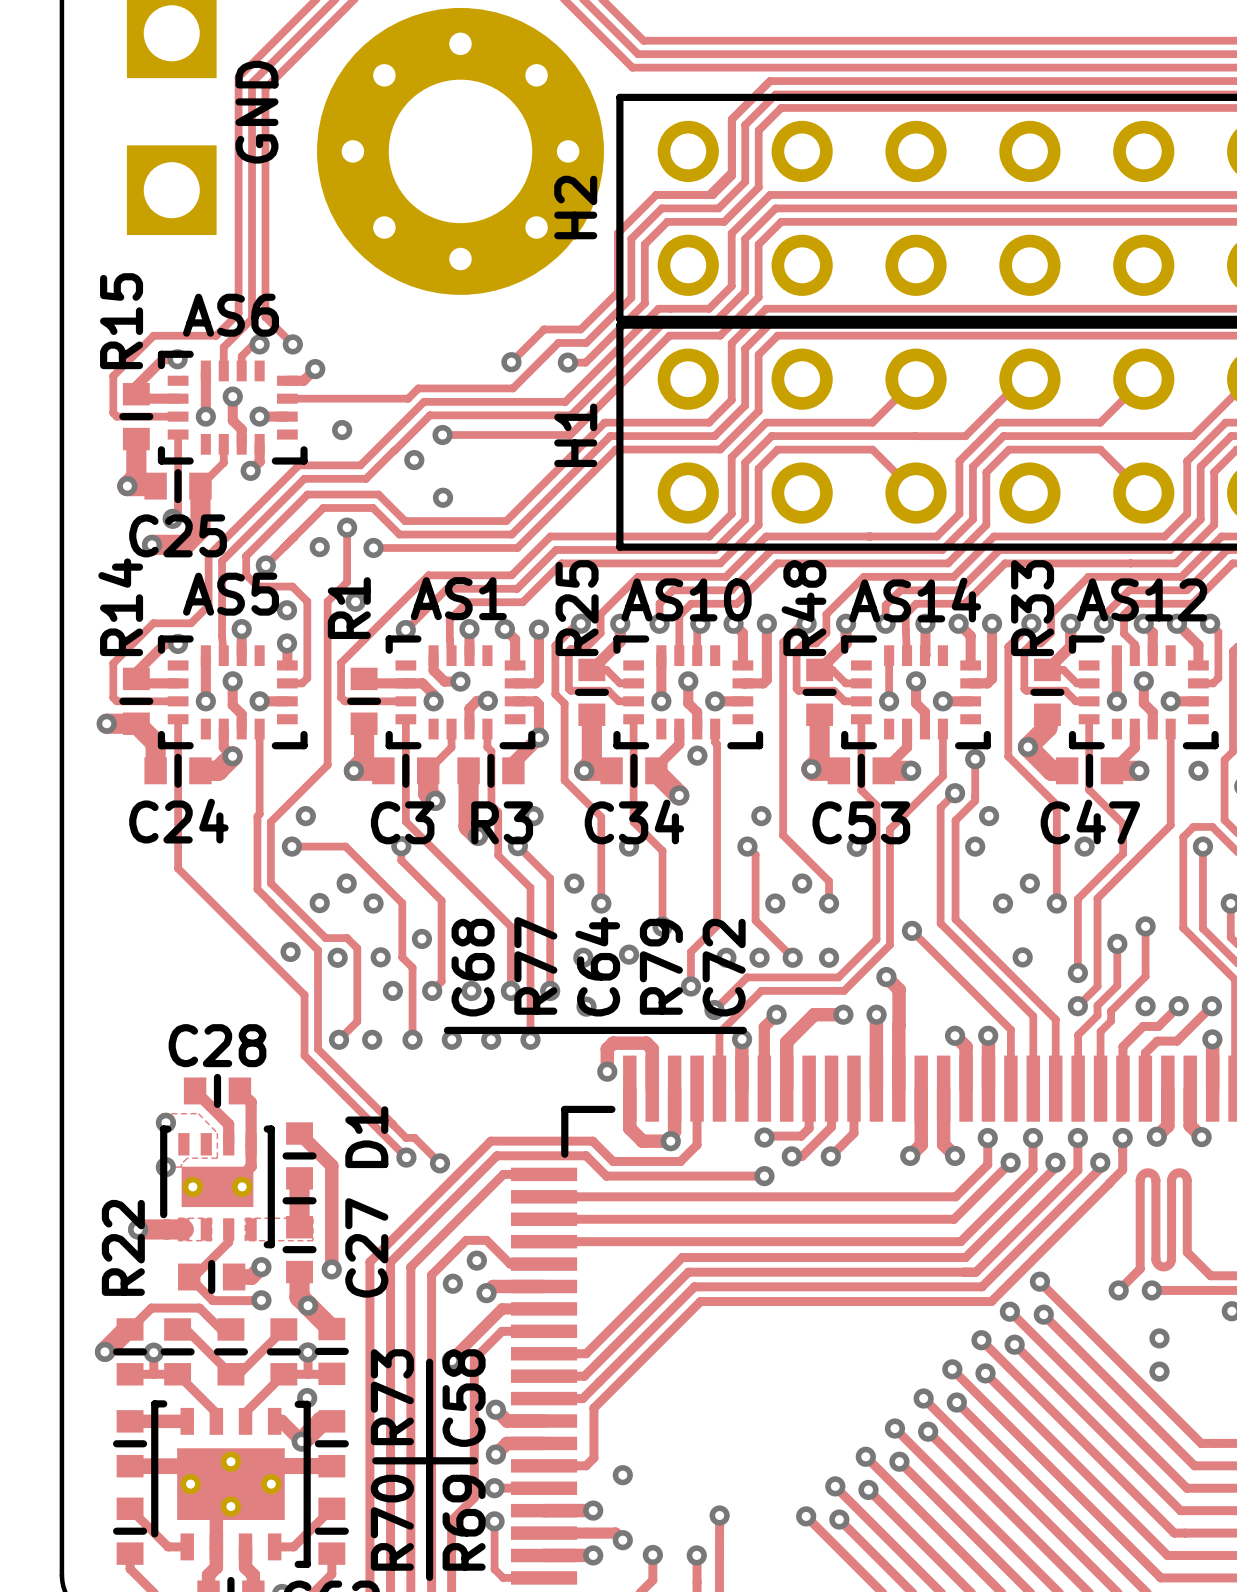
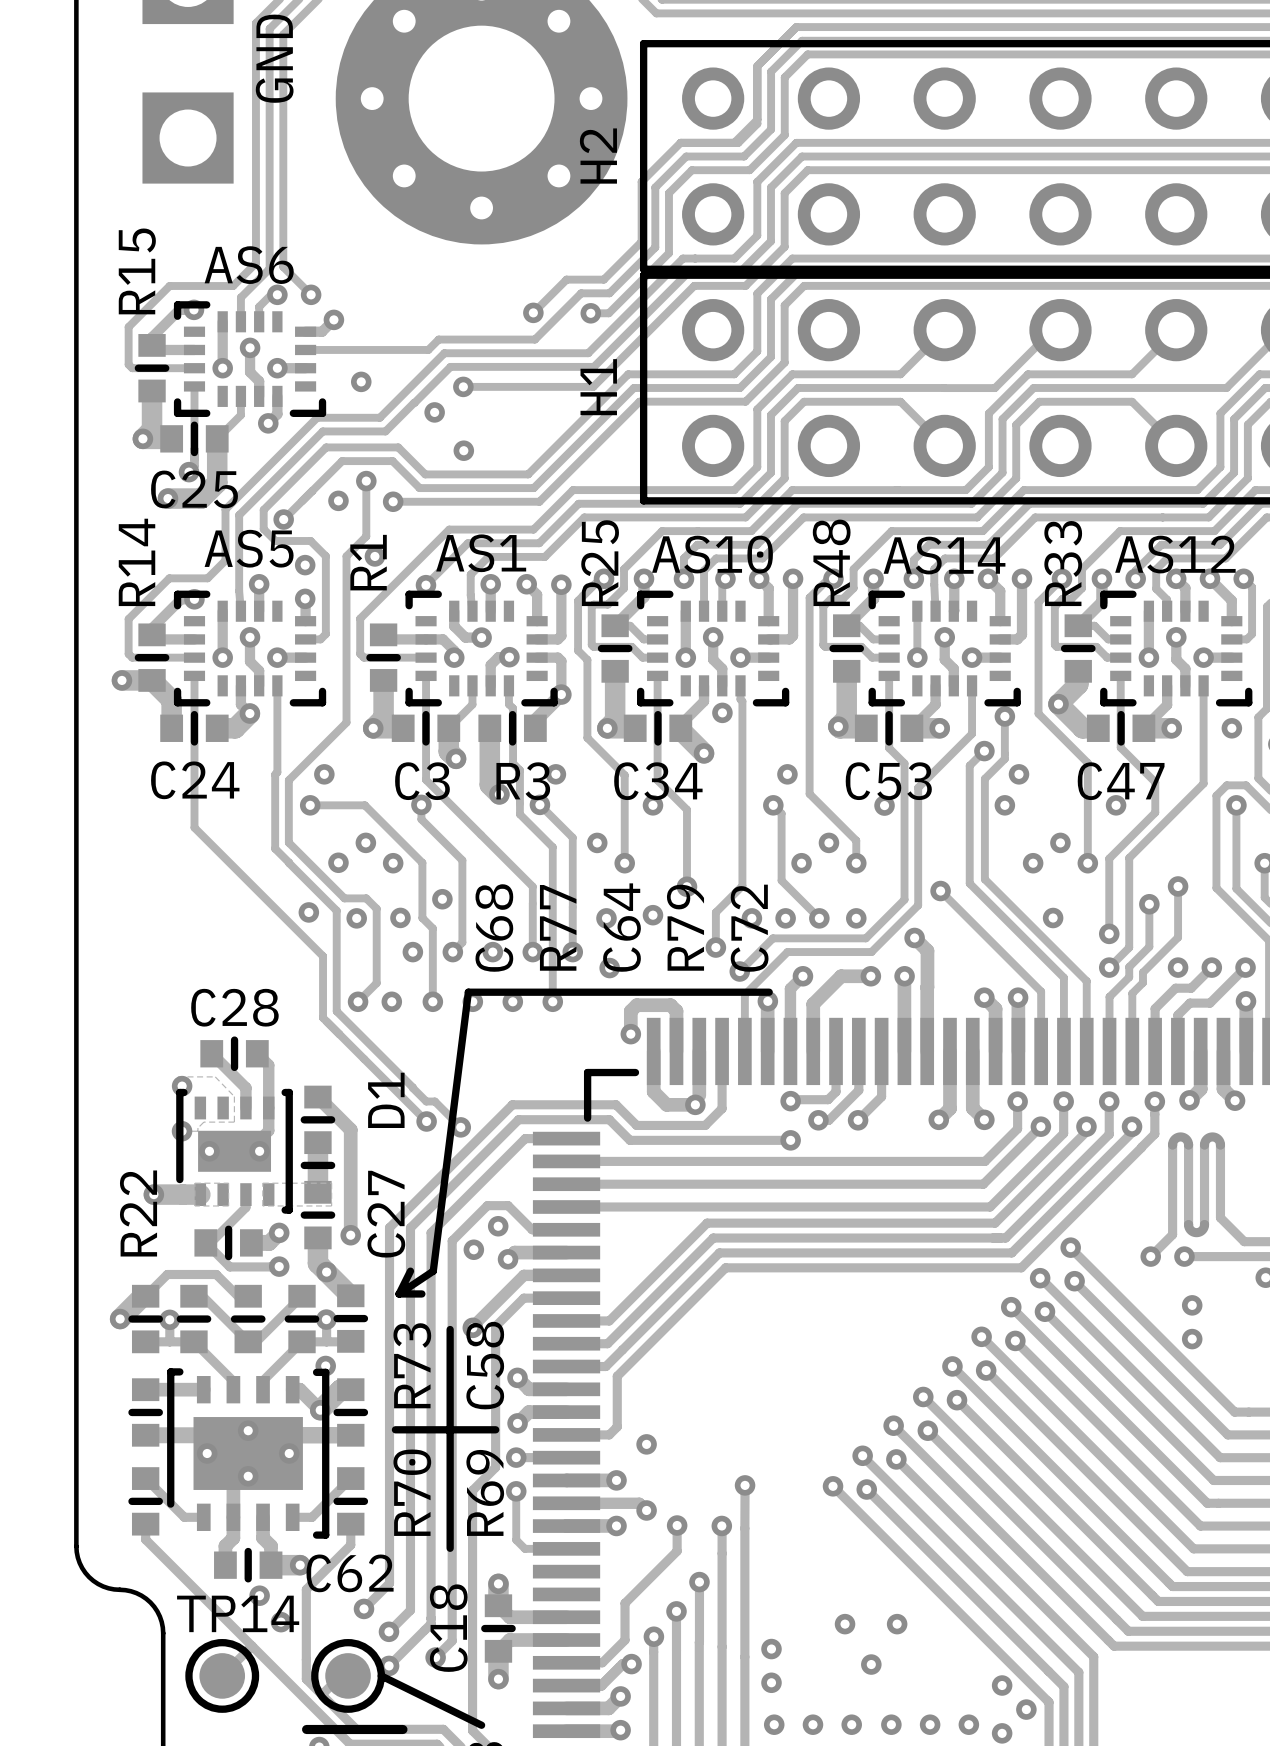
line: none -> (468, 992) (433, 1271) (399, 1293)
line: none -> (410, 1271) (399, 1293)
line: none -> (399, 1293) (421, 1293)

